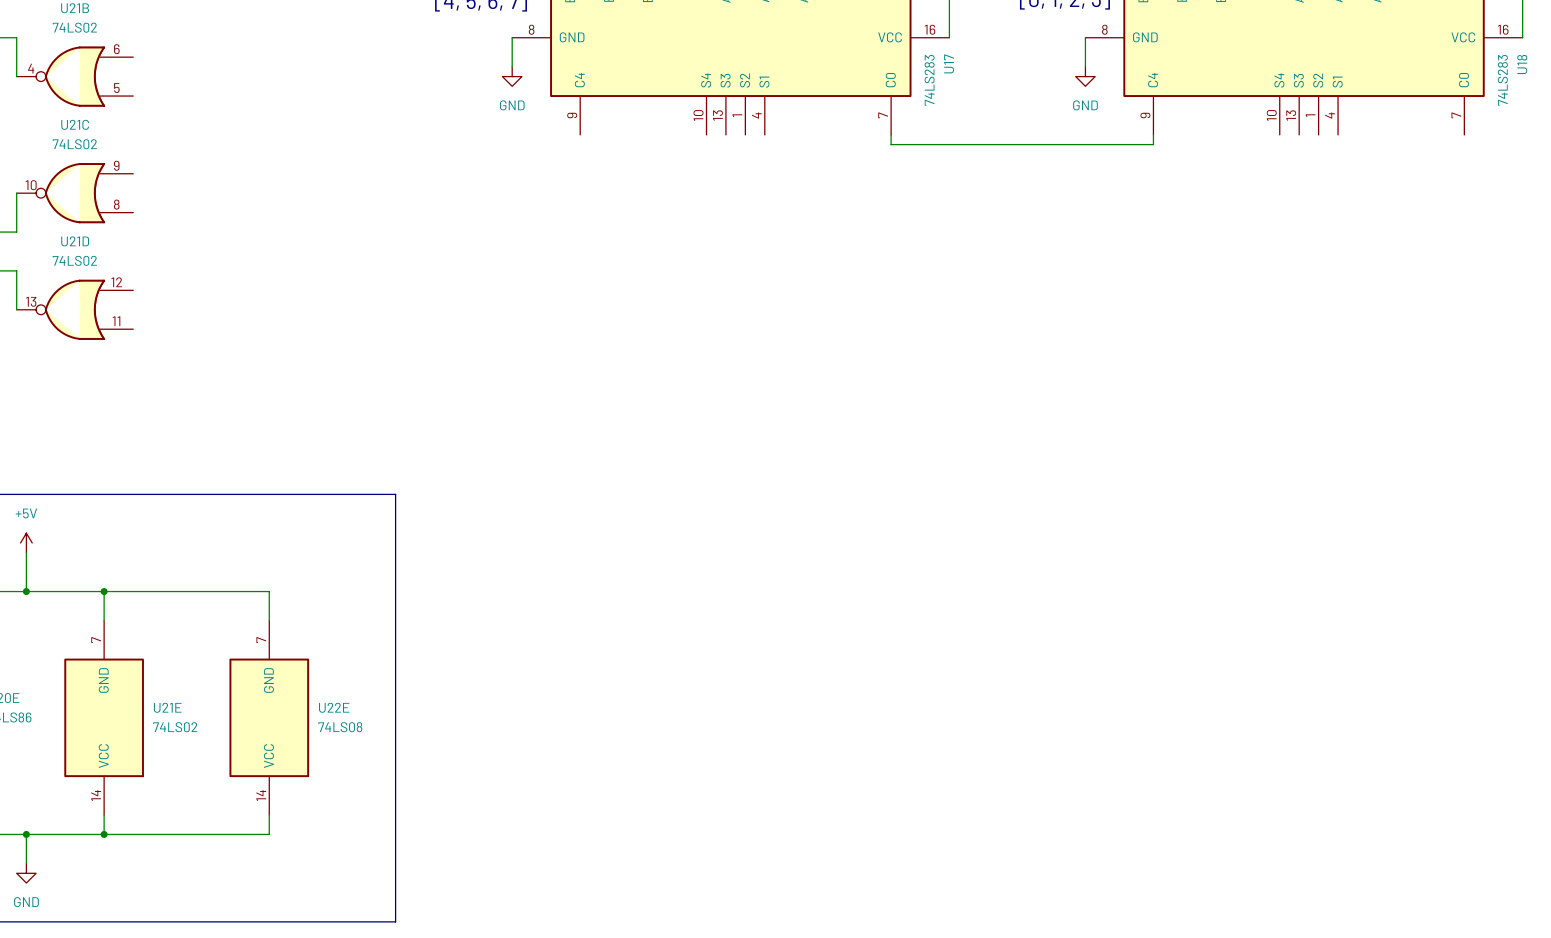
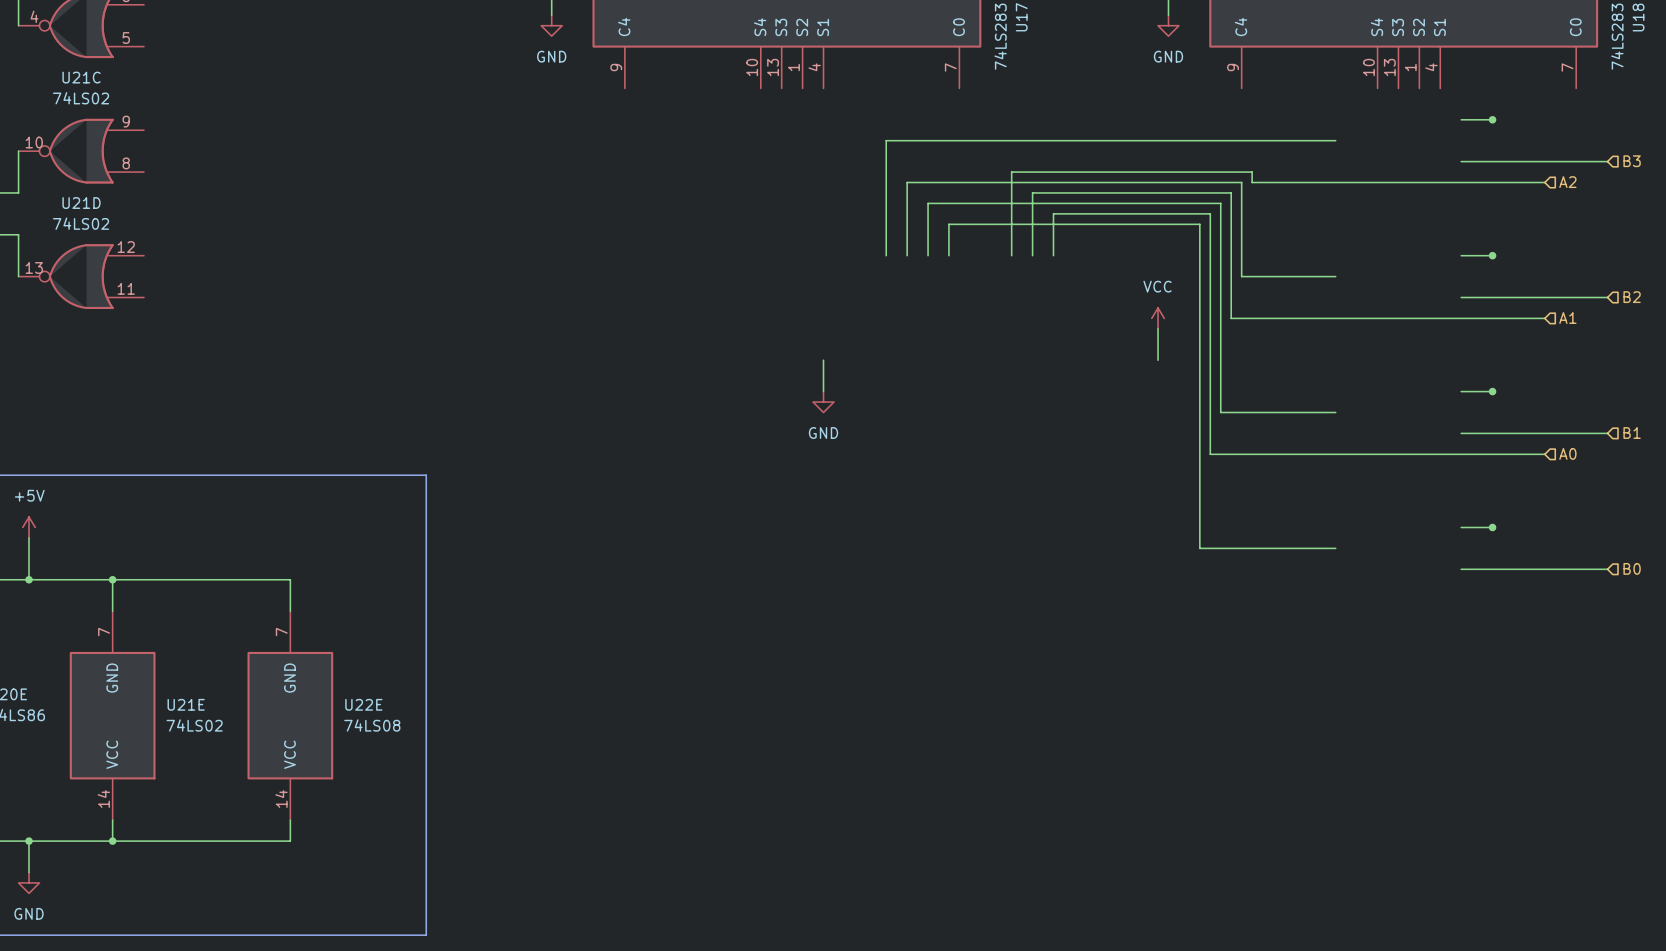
wire: (891, 134) (891, 144) (1153, 144) (1153, 134) -> none
wire: none -> (1461, 119) (1492, 119)
junction: none -> (1492, 119)
wire: none -> (1335, 140) (886, 140) (886, 255)
wire: none -> (1461, 161) (1607, 161)
hierarchical label: none -> B3 (1632, 161)
hierarchical label: none -> A2 (1567, 182)
wire: none -> (1544, 182) (1252, 182) (1252, 172) (1011, 172) (1011, 255)
wire: none -> (907, 255) (907, 182) (1241, 182) (1241, 276) (1335, 276)
wire: none -> (928, 255) (928, 203) (1220, 203) (1220, 412) (1335, 412)
wire: none -> (948, 255) (948, 224) (1199, 224) (1199, 548) (1335, 548)
wire: none -> (1032, 255) (1032, 192) (1231, 192) (1231, 318) (1544, 318)
wire: none -> (1053, 255) (1053, 213) (1210, 213) (1210, 454) (1544, 454)
wire: none -> (1461, 255) (1492, 255)
junction: none -> (1492, 255)
hierarchical label: none -> B2 (1632, 297)
wire: none -> (1461, 297) (1607, 297)
power symbol: none -> VCC (1158, 318)
hierarchical label: none -> A1 (1567, 318)
wire: none -> (1158, 328) (1158, 360)
wire: none -> (823, 360) (823, 391)
wire: none -> (1461, 391) (1492, 391)
junction: none -> (1492, 391)
power symbol: none -> GND (823, 402)
wire: none -> (1461, 433) (1607, 433)
hierarchical label: none -> B1 (1632, 433)
hierarchical label: none -> A0 (1567, 453)
wire: none -> (1461, 527) (1492, 527)
junction: none -> (1492, 527)
wire: none -> (1461, 569) (1607, 569)
hierarchical label: none -> B0 (1632, 568)

